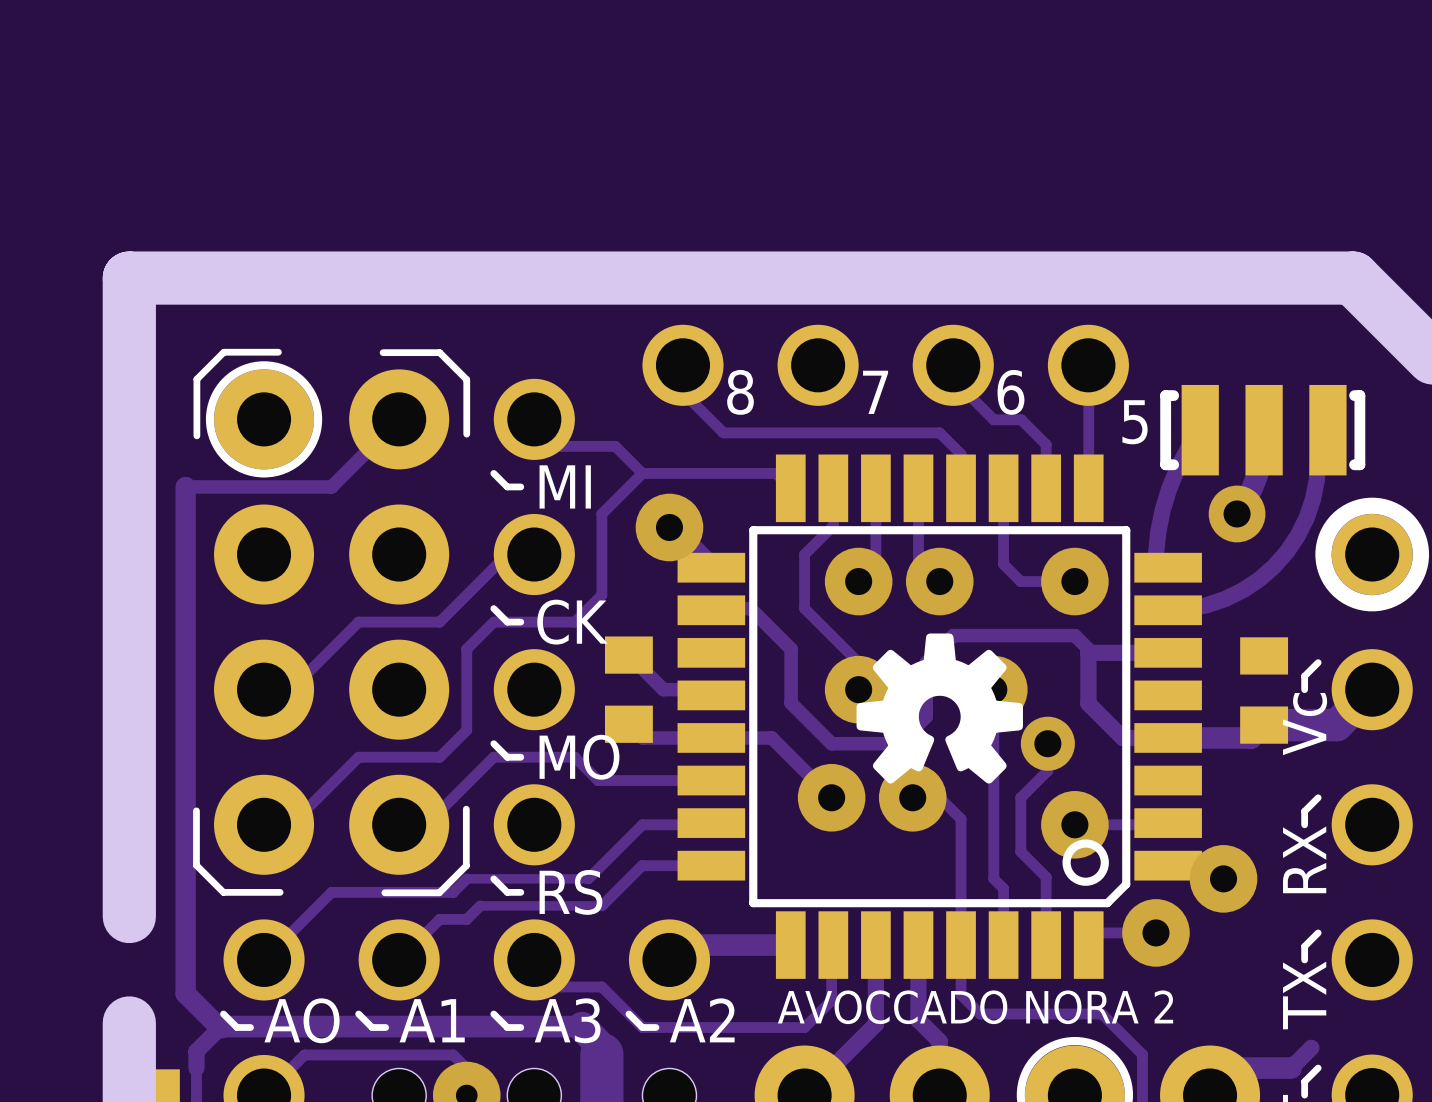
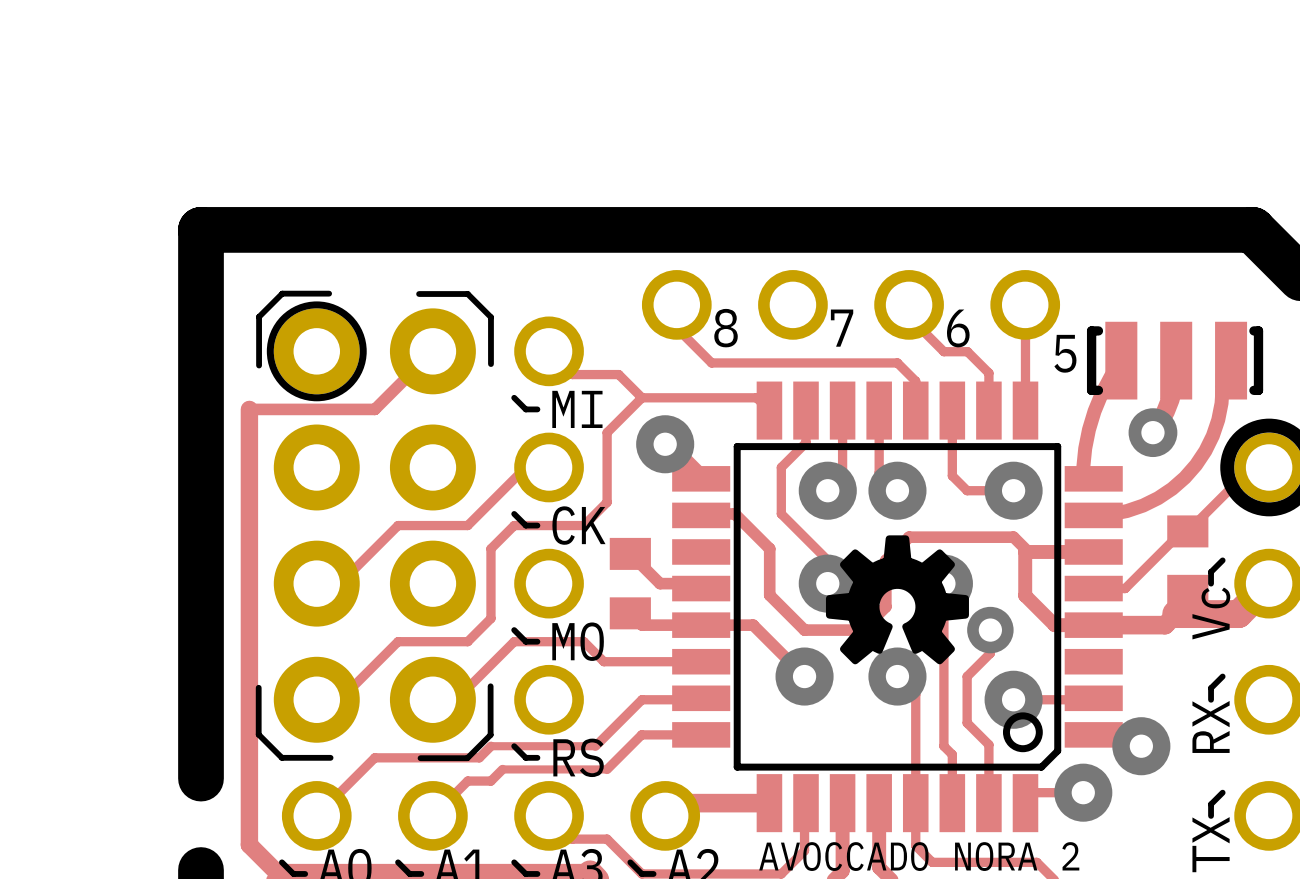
track: none -> (1269, 467) (1251, 467) (1187, 531) (1182, 531) (1125, 588) (1093, 588)
part position: (1264, 690) -> (1187, 561)
via position: (912, 797) -> (897, 676)

